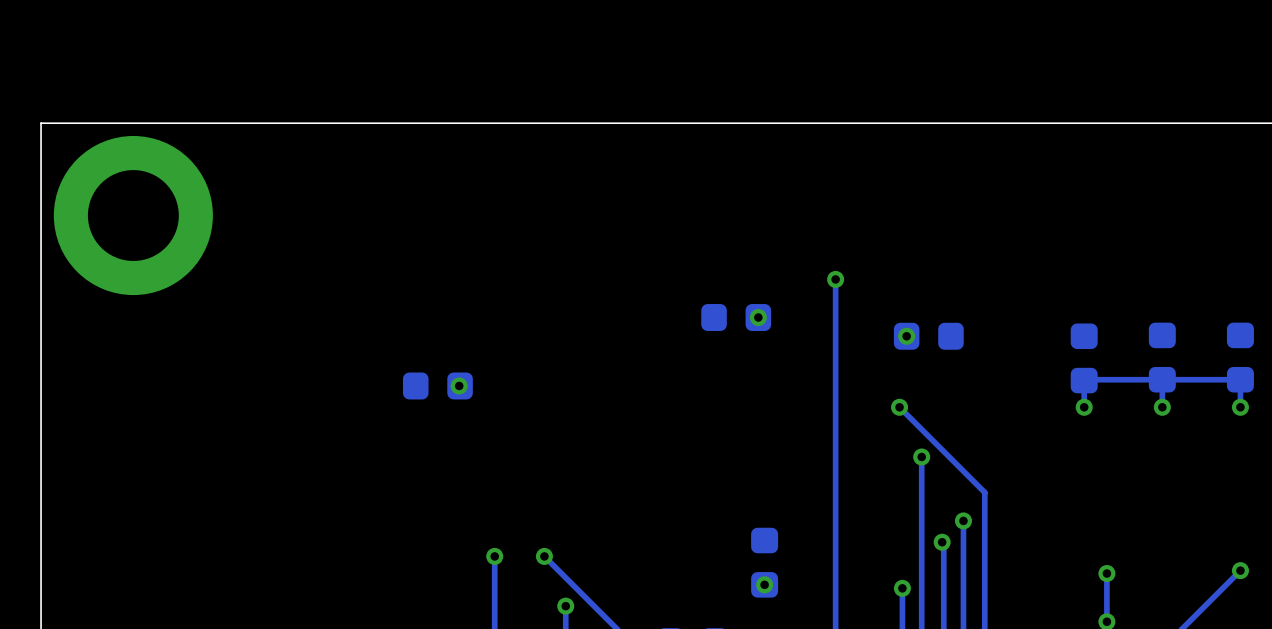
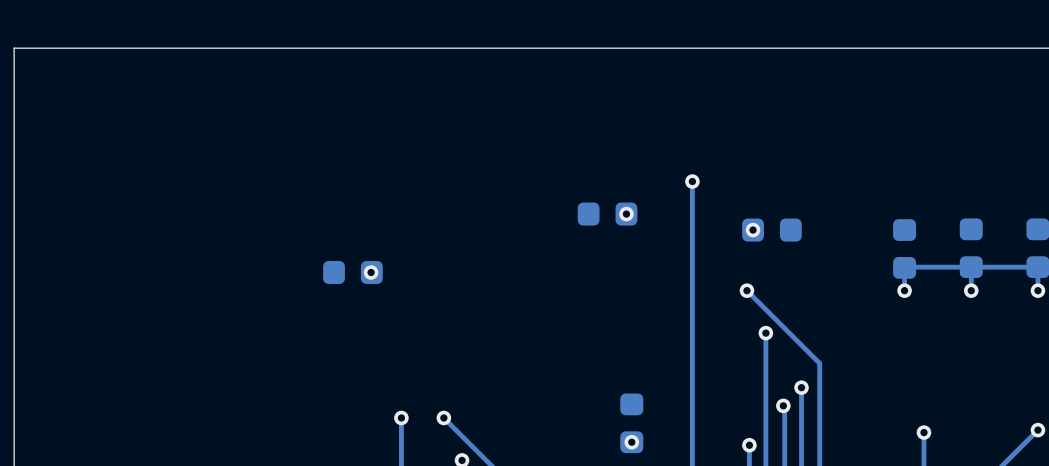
part: (133, 215) -> none

